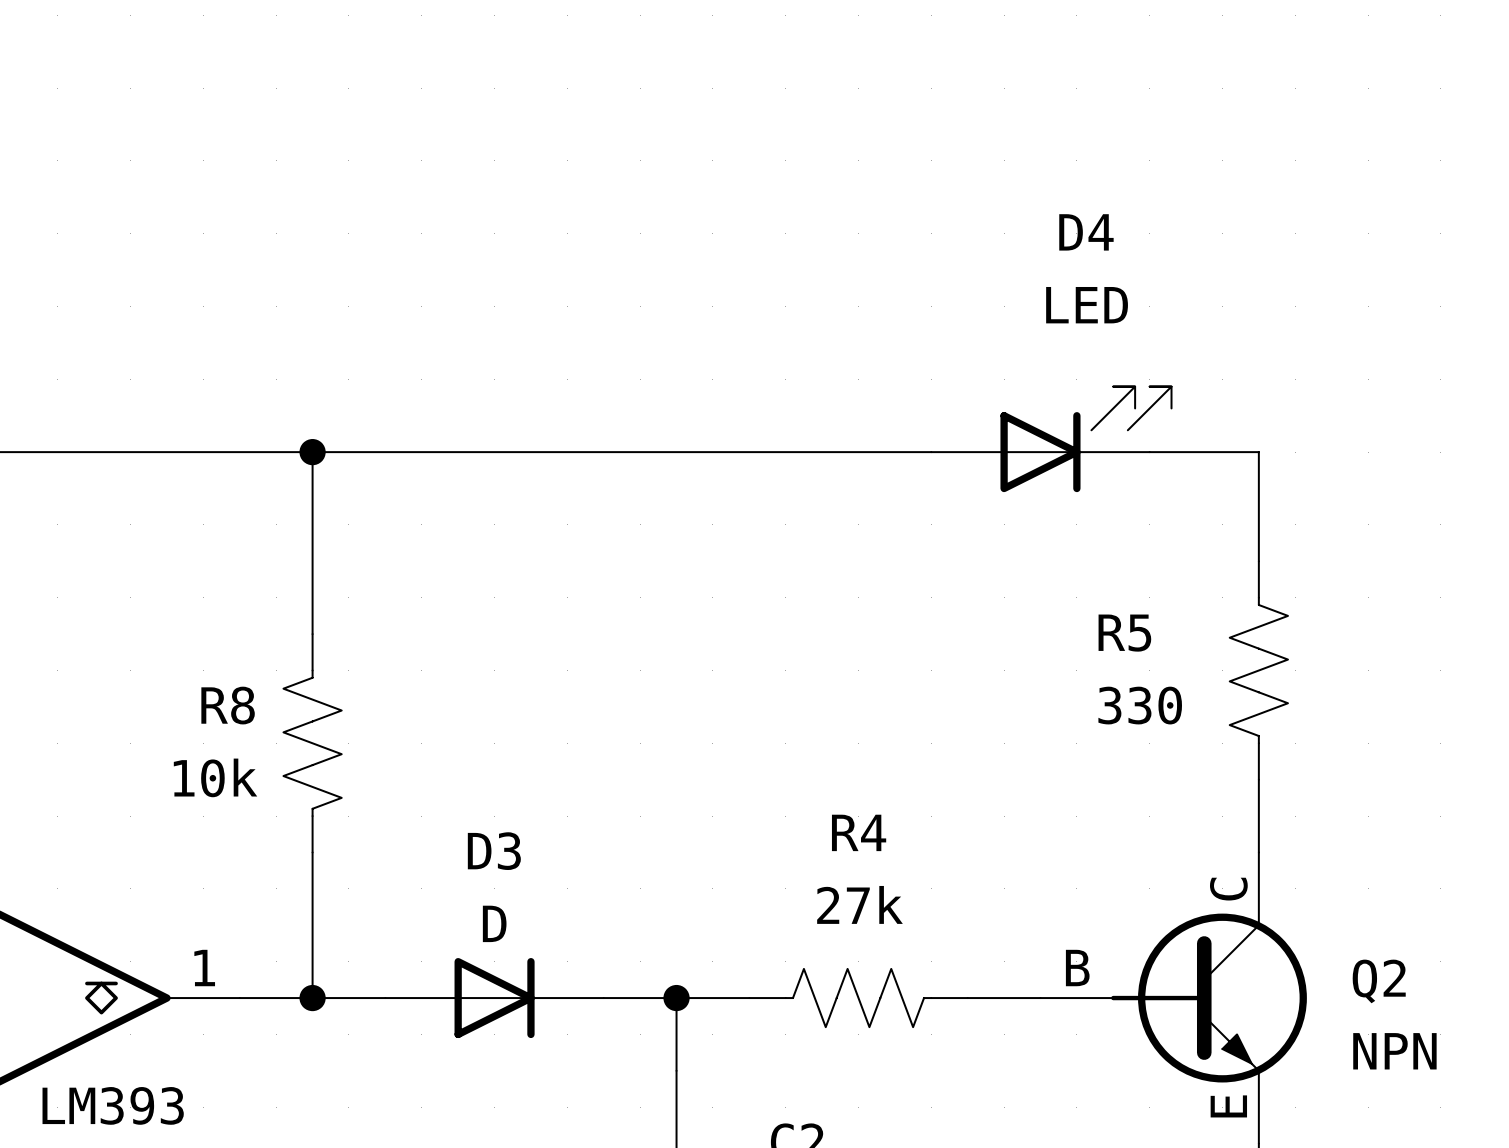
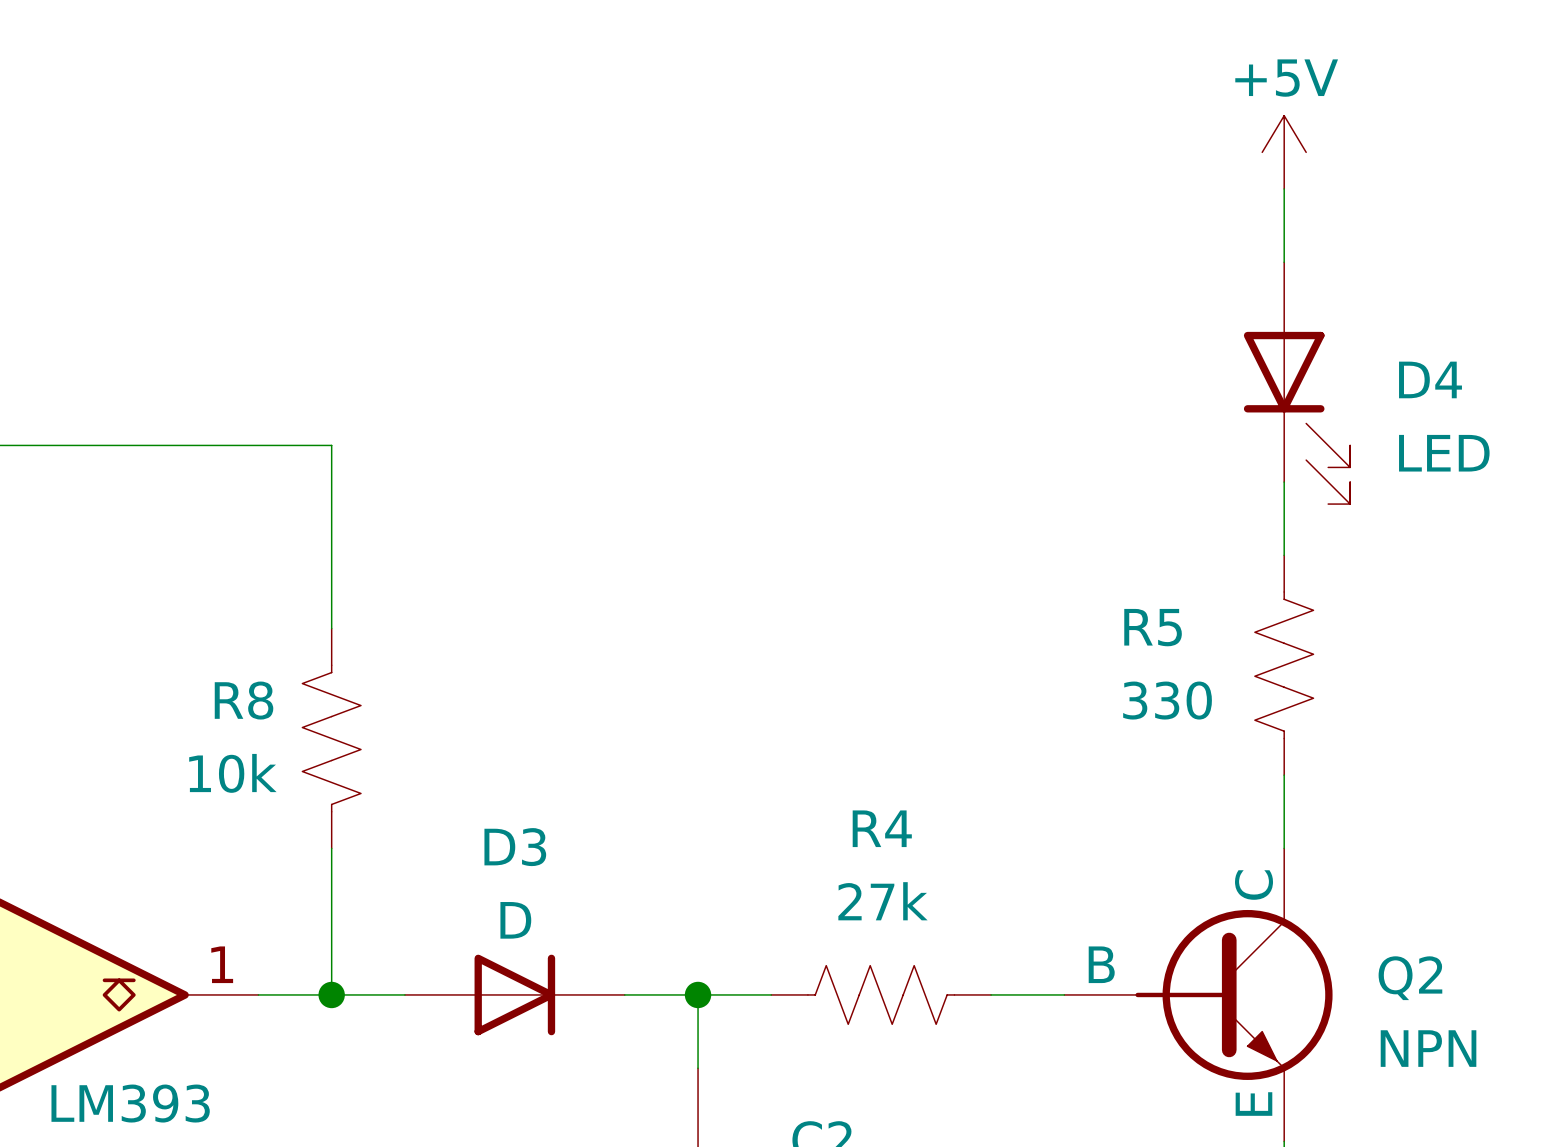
power symbol: none -> +5V (1284, 152)
wire: none -> (1284, 188) (1284, 262)
D4 name position: D4 (1086, 232) -> D4 (1430, 379)
D4 position: (1051, 439) -> (1297, 383)
D4 rotation: 0° (1085, 439) -> 90° clockwise (1297, 417)
wire: (312, 452) (931, 452) -> none
junction: (312, 452) -> none
wire: (1149, 452) (1258, 452) (1258, 488) -> none

